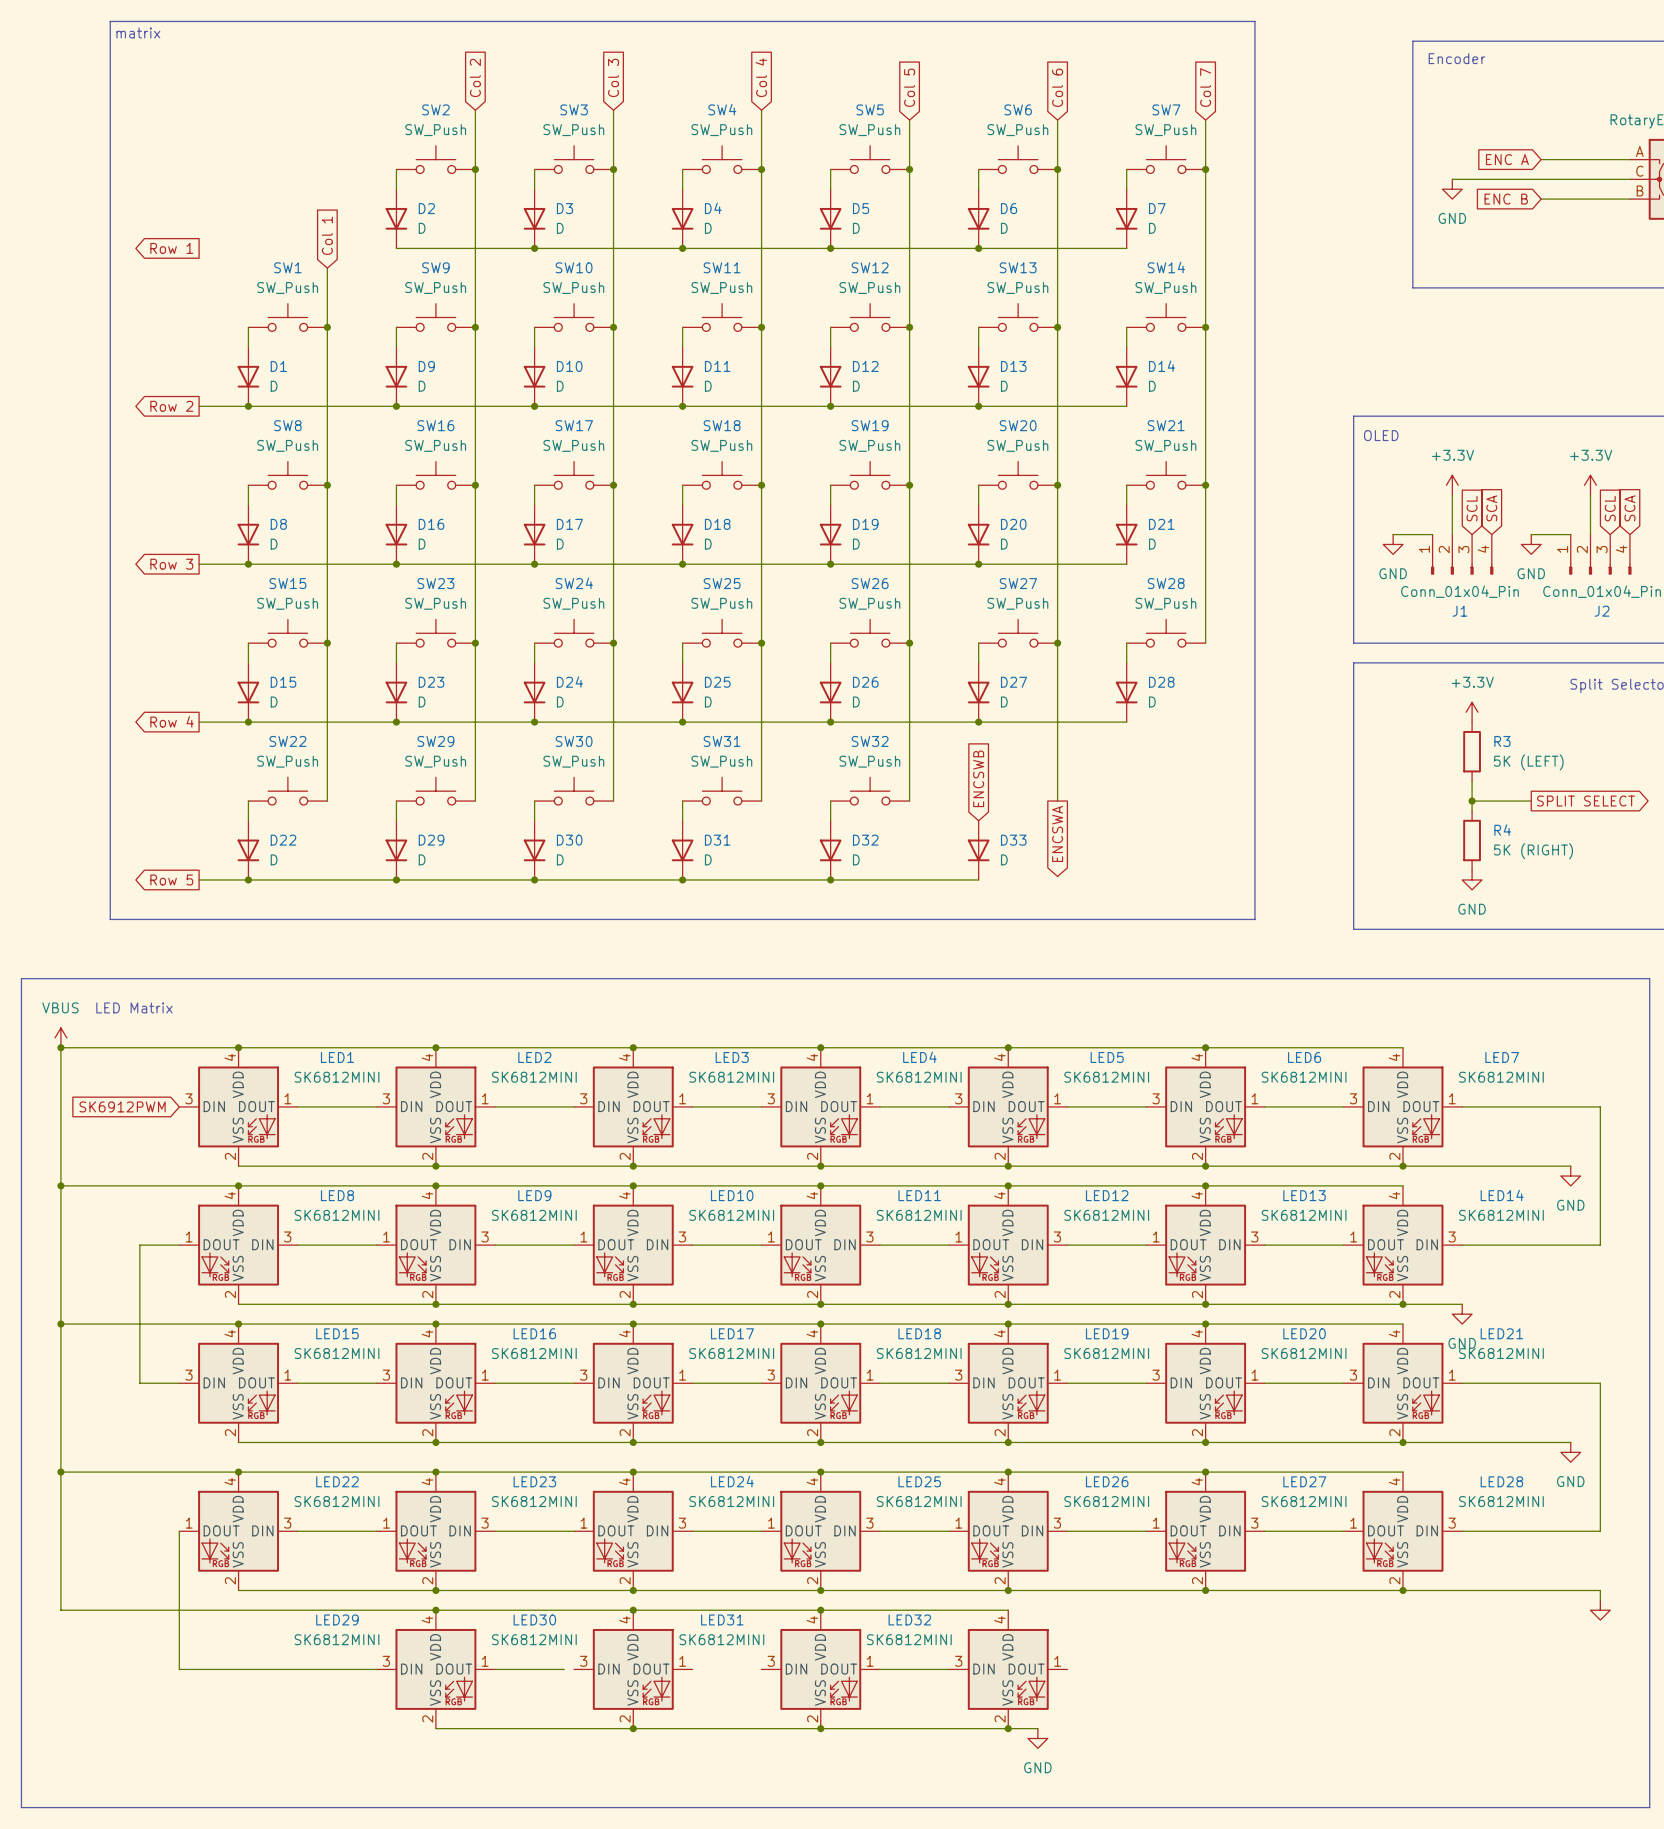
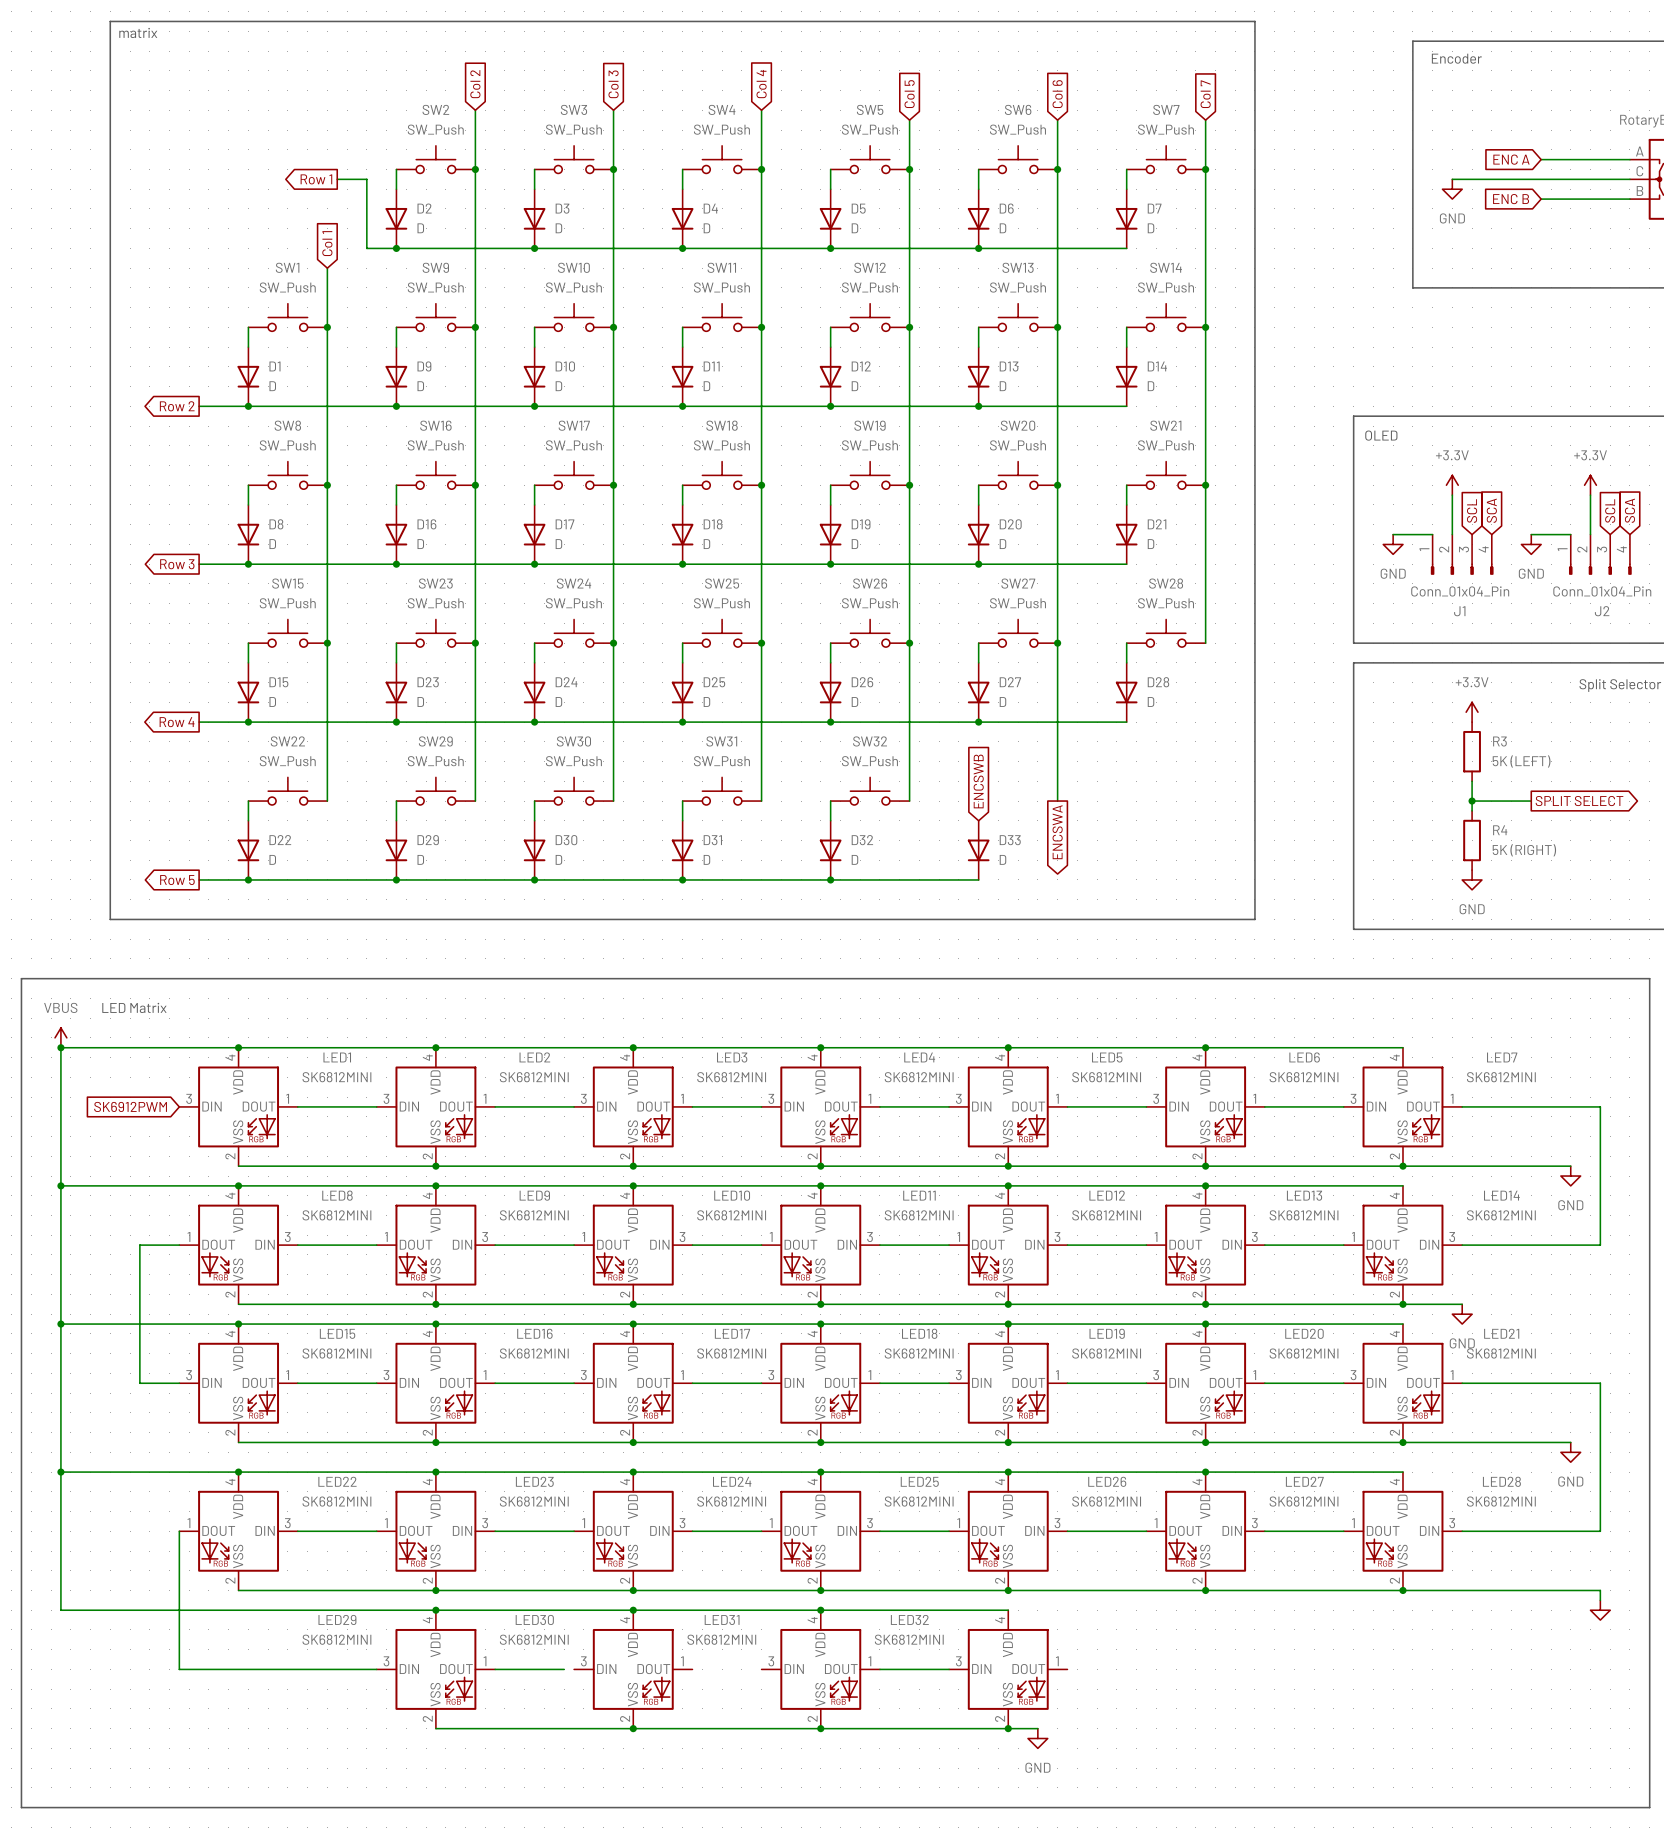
wire: none -> (337, 179) (366, 179) (366, 248) (396, 248)
global label position: Row 1 (171, 248) -> Row 1 (316, 179)
junction: none -> (396, 248)

